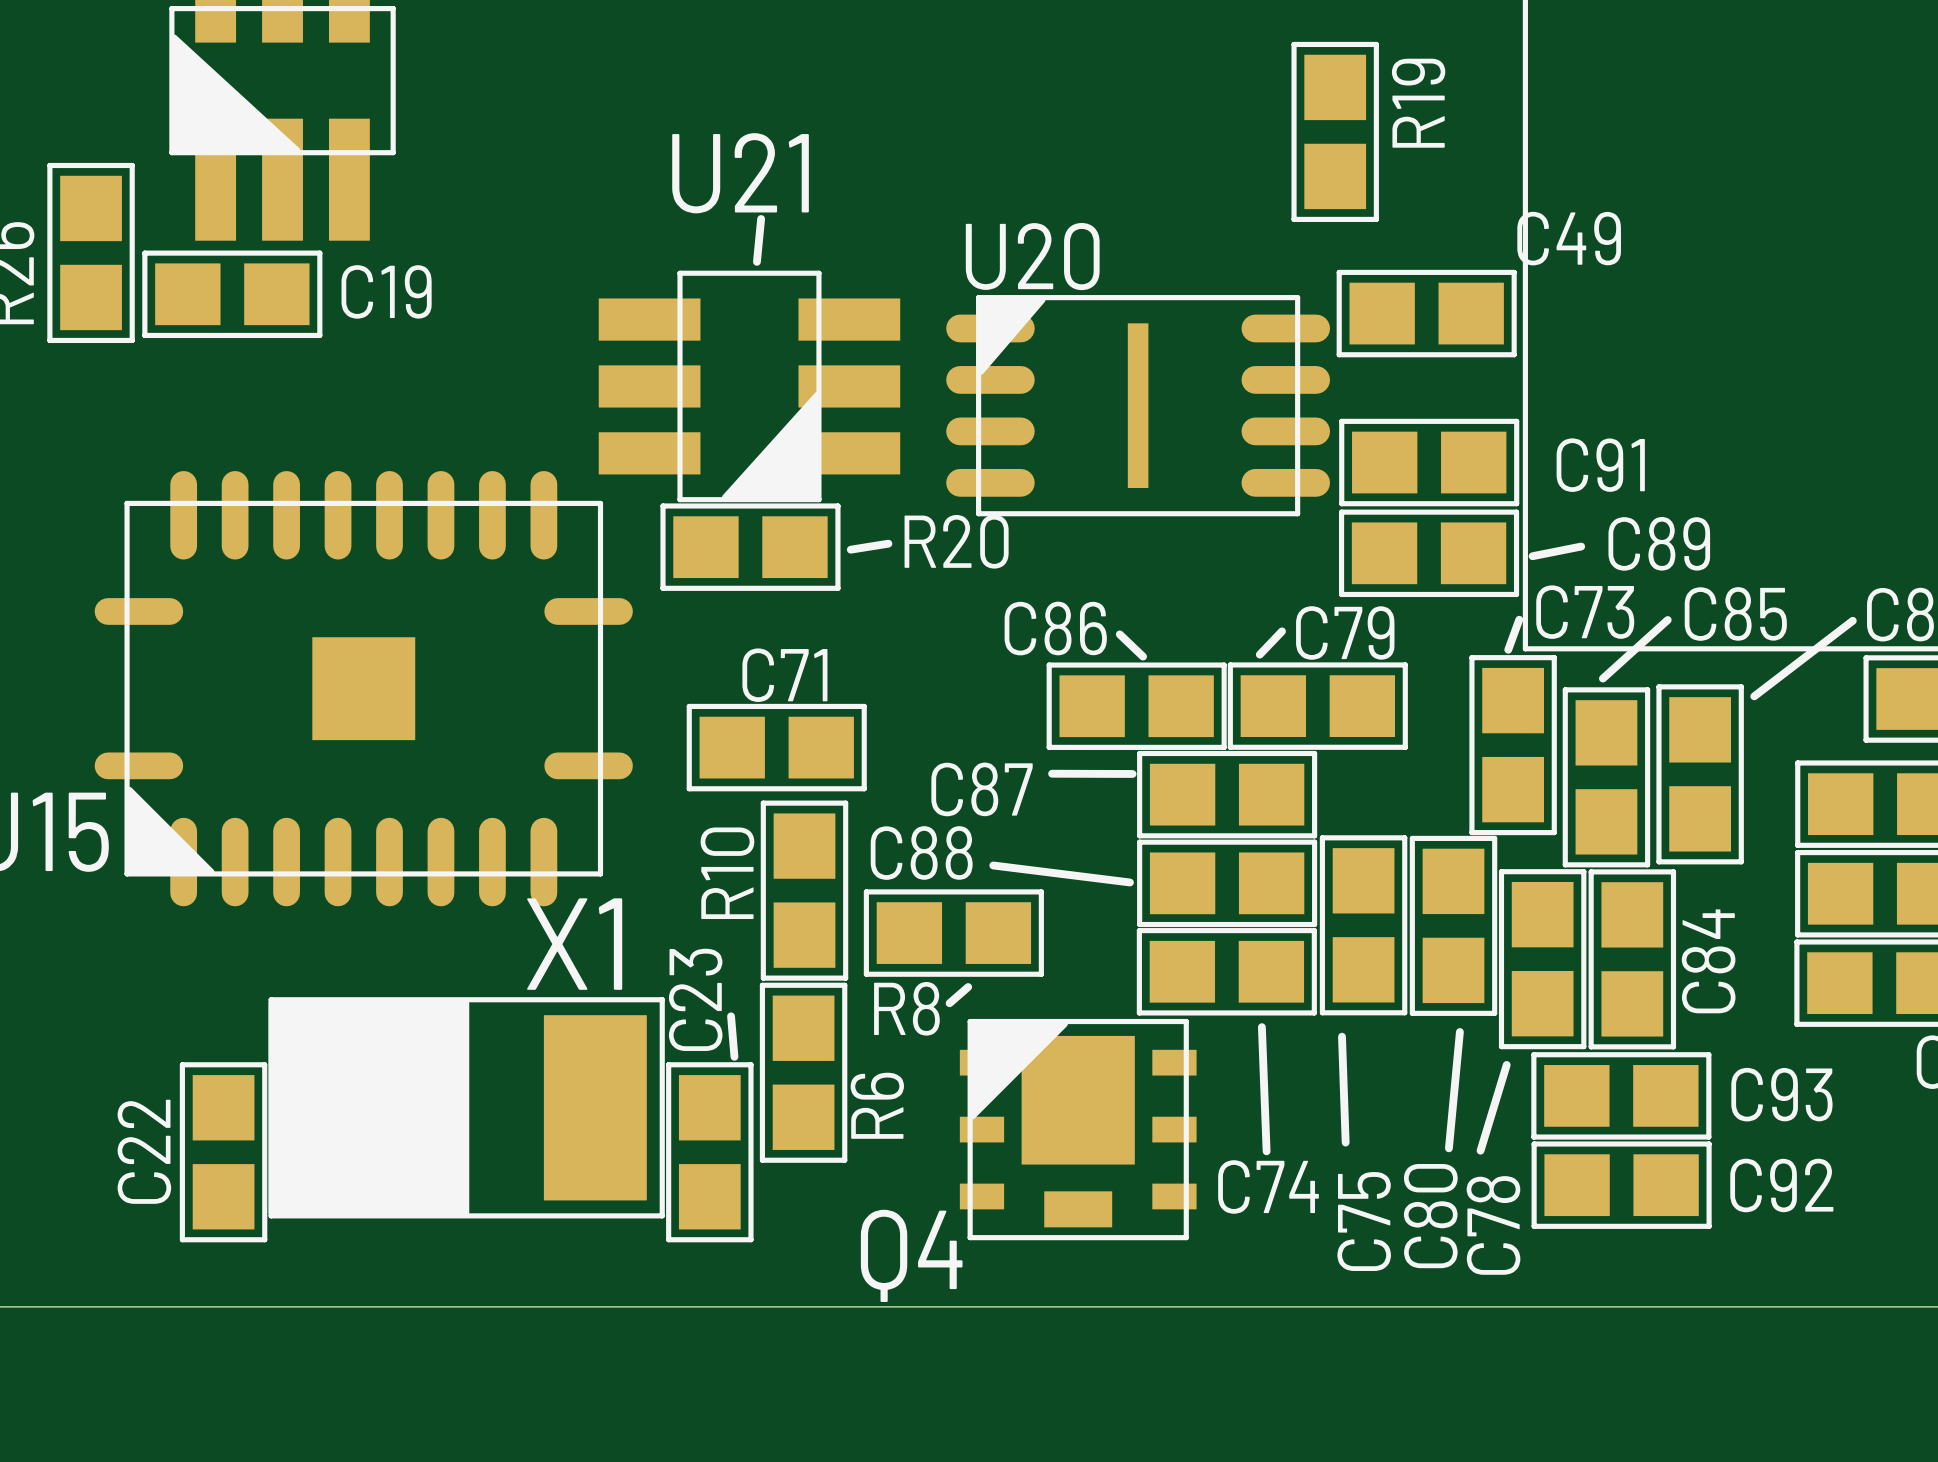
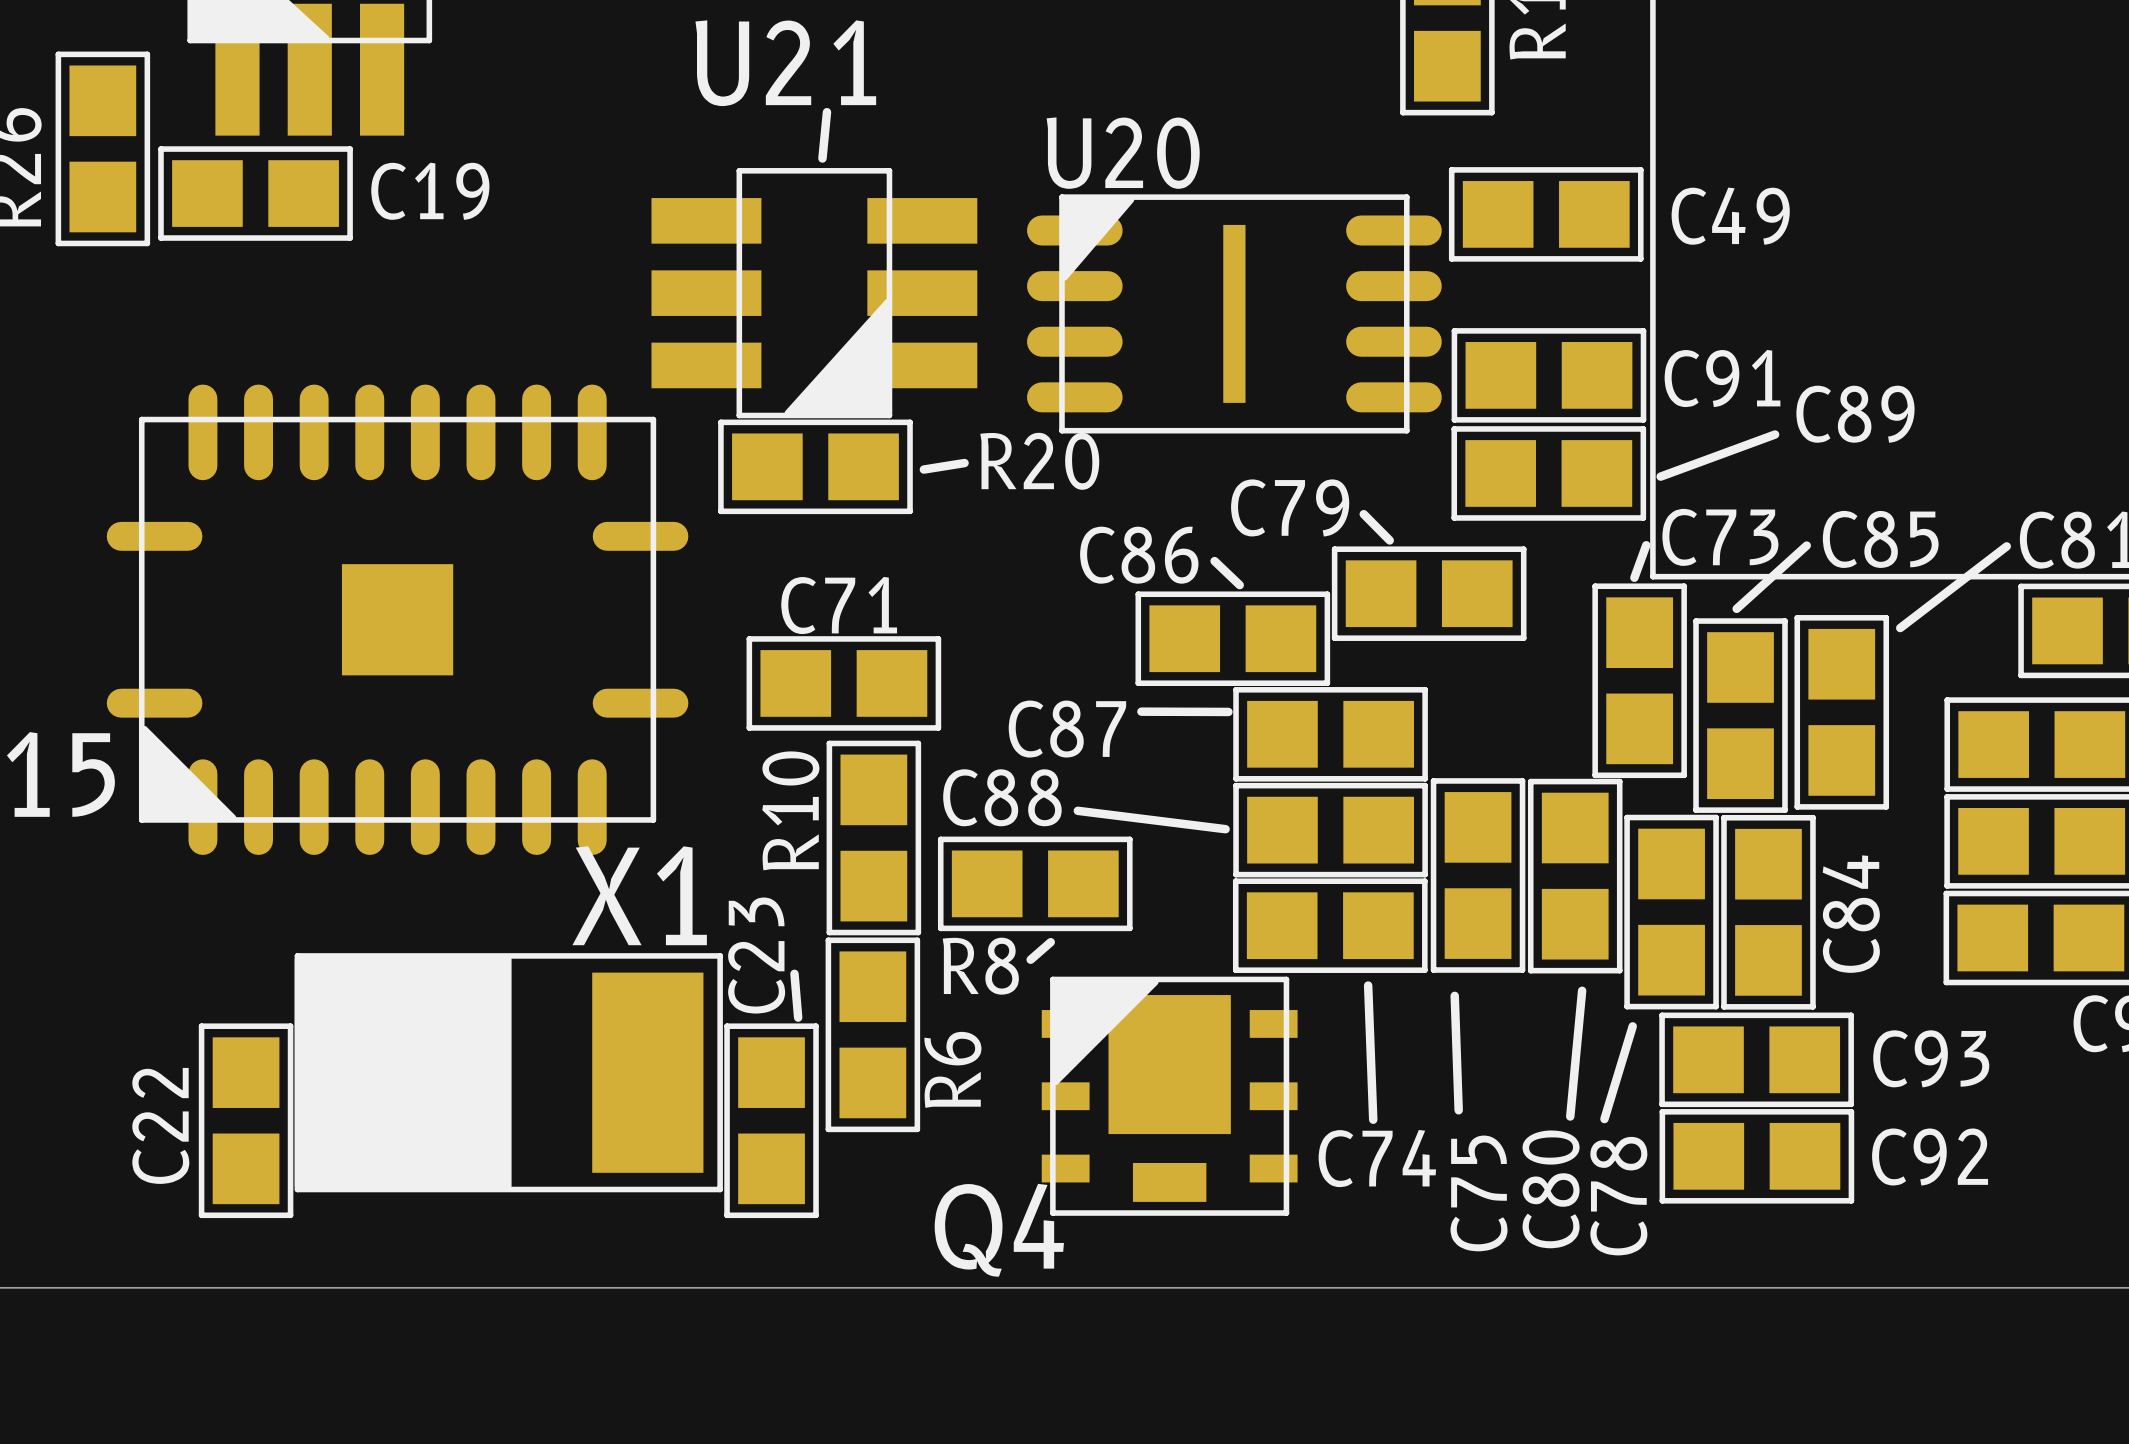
C49 name position: C49 (1569, 238) -> C49 (1730, 216)
C89 name position: C89 (1659, 543) -> C89 (1855, 414)
line: (1581, 546) (1532, 556) -> (1775, 434) (1660, 476)
line: none -> (1363, 514) (1389, 540)
line: (1282, 631) (1259, 654) -> none
C79 name position: C79 (1345, 632) -> C79 (1290, 507)
C79 position: (1317, 706) -> (1429, 593)

